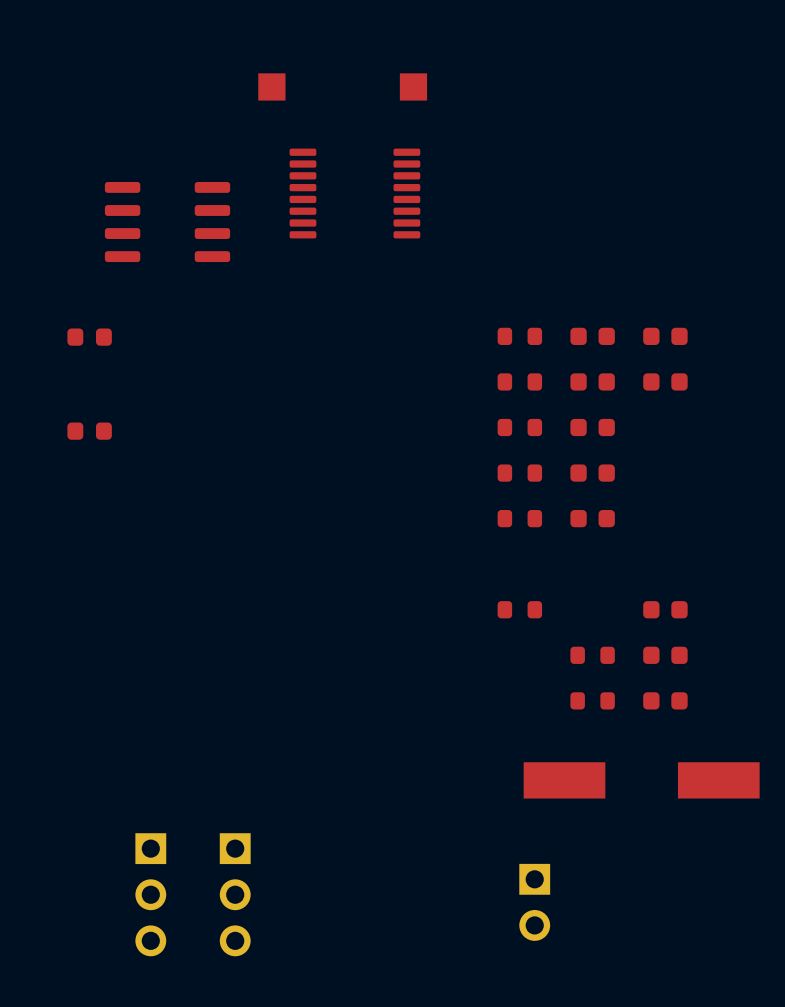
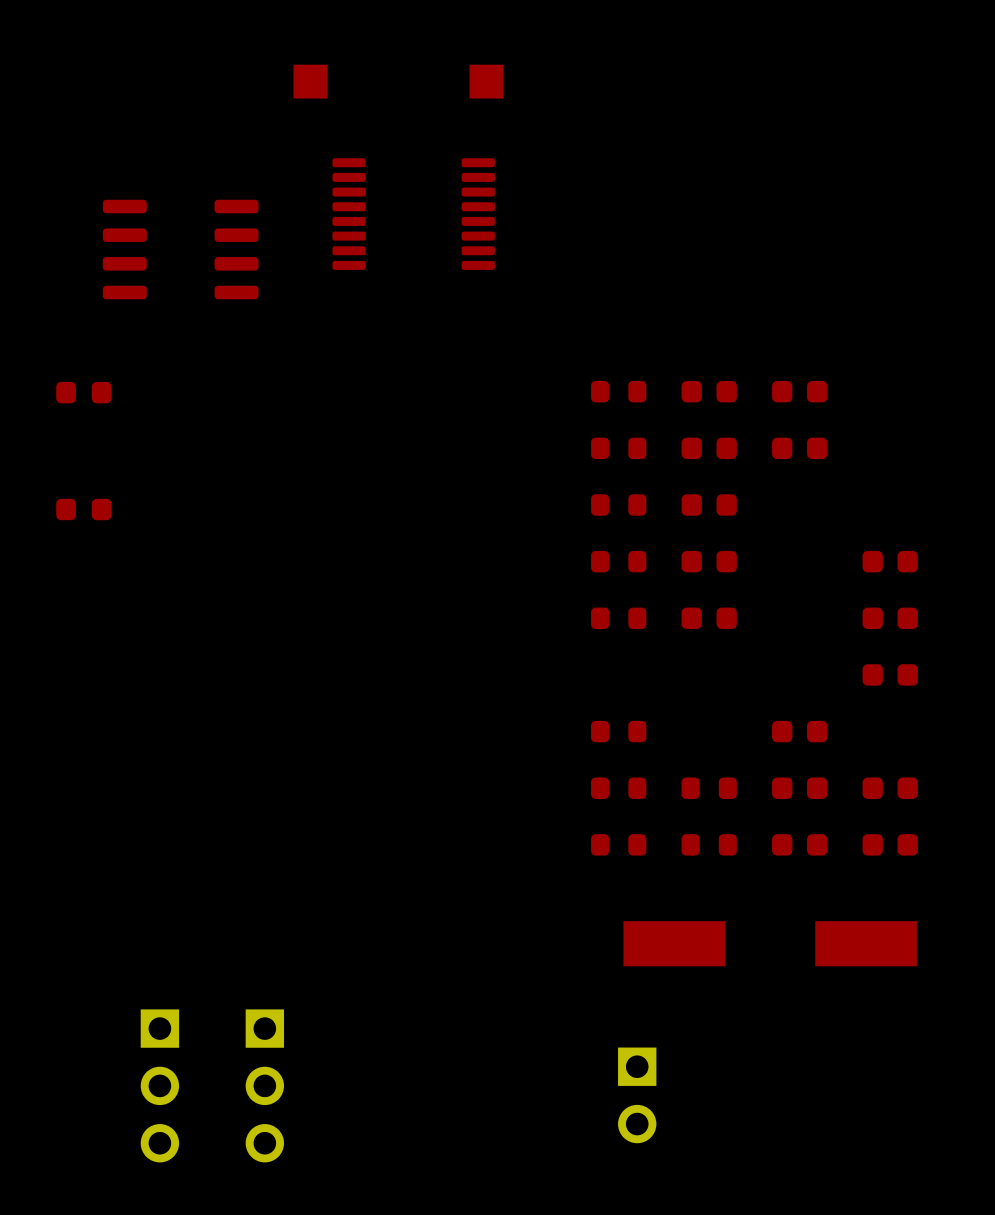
part: none -> (890, 561)
part: none -> (890, 618)
part: none -> (890, 674)
part: none -> (618, 788)
part: none -> (890, 788)
part: none -> (618, 844)
part: none -> (890, 844)

